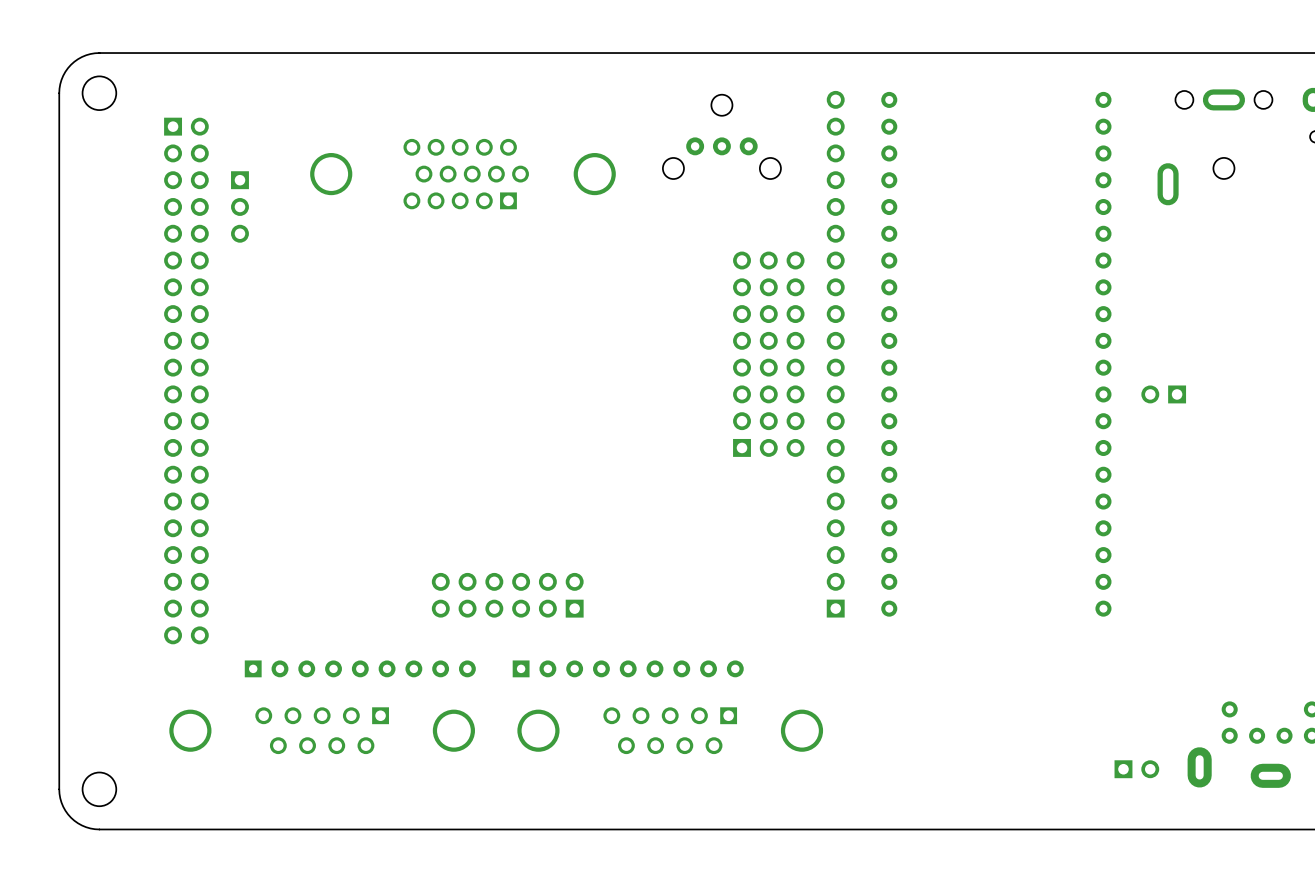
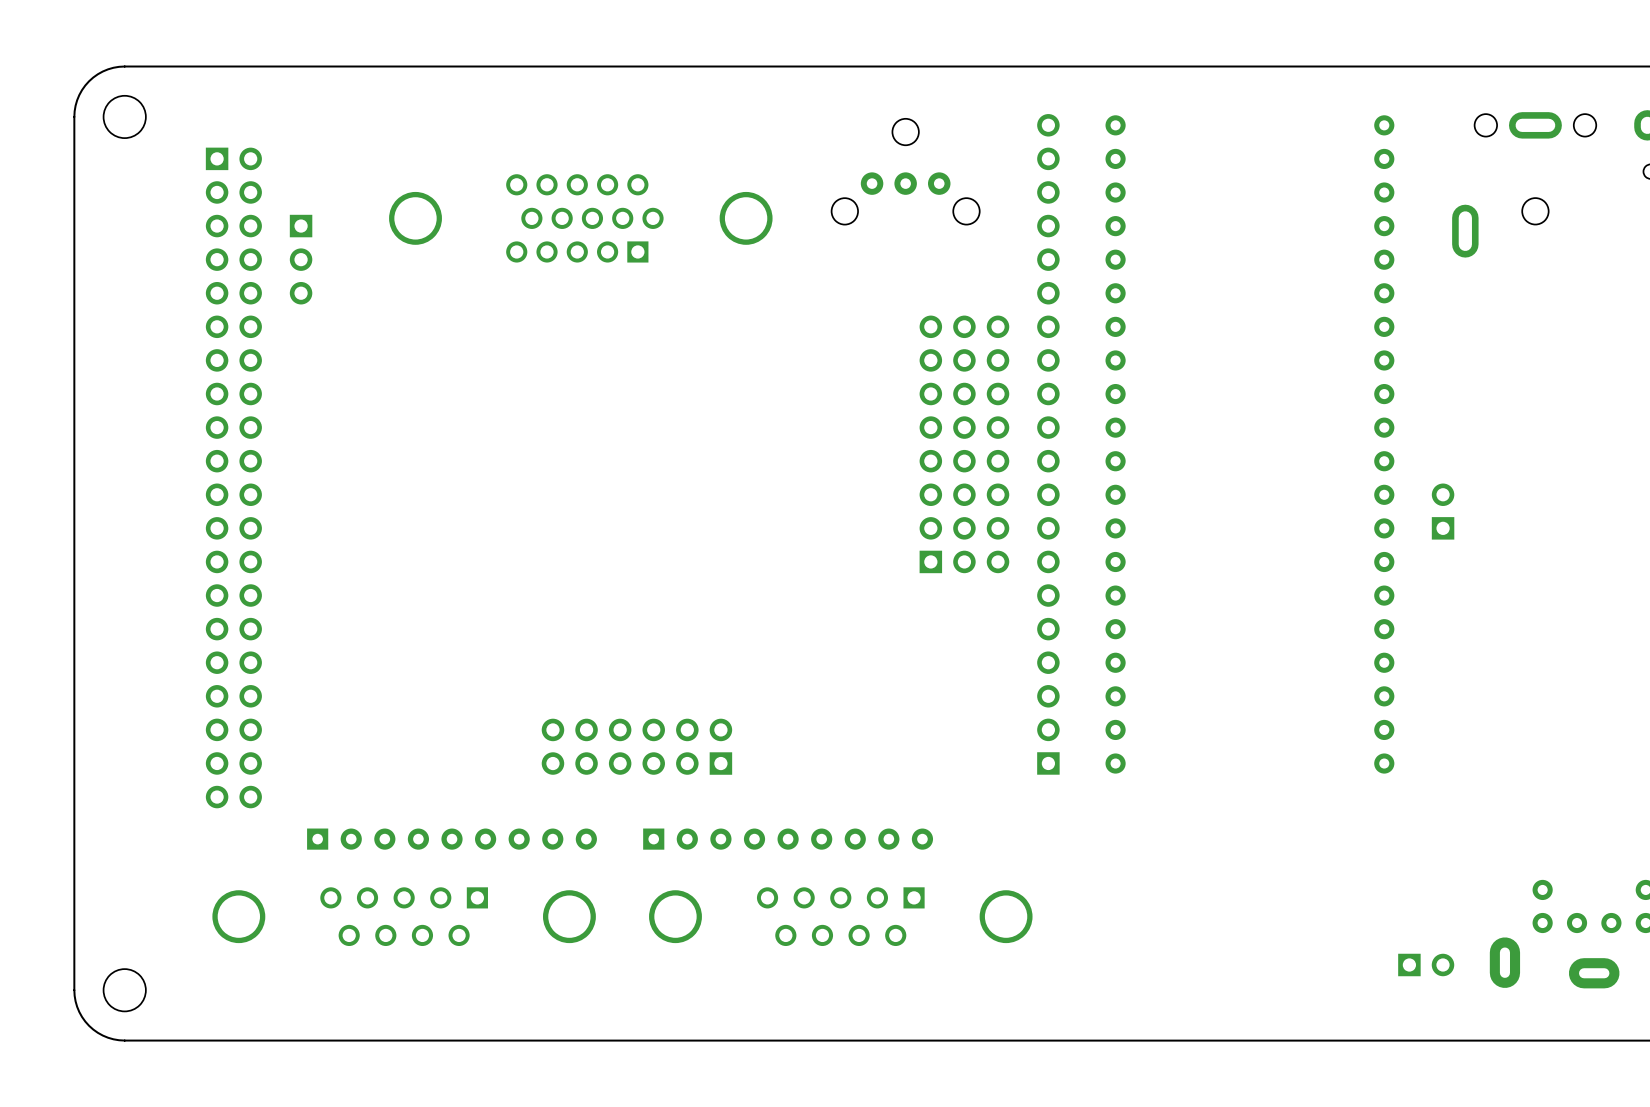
part rotation: 0° (1163, 394) -> 90° clockwise (1443, 511)

